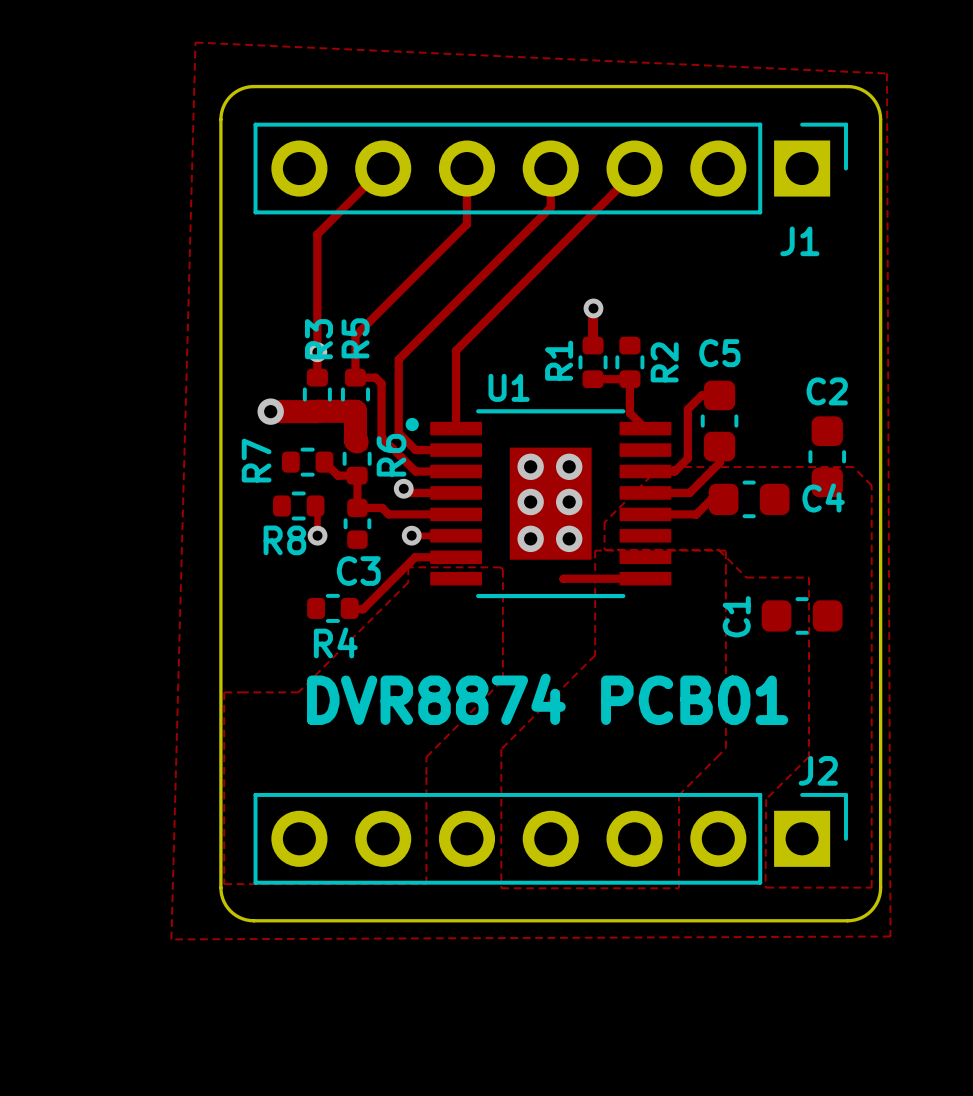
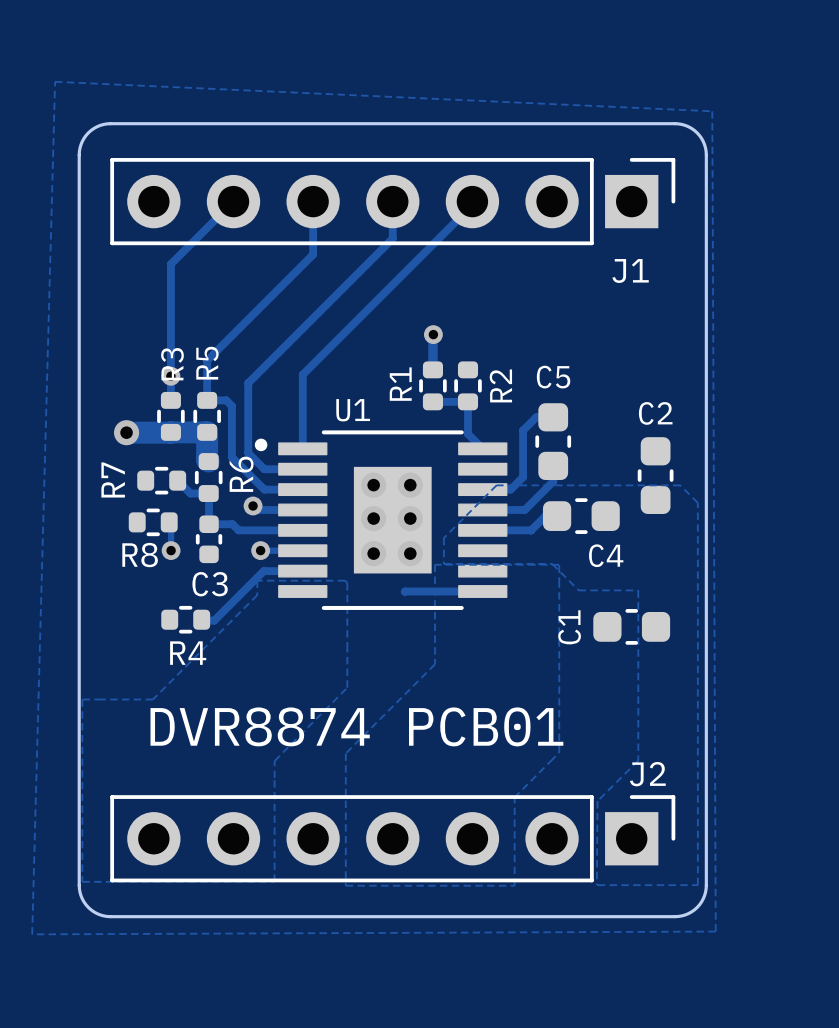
C4 name position: C4 (823, 497) -> C4 (606, 555)
text position: DVR8874 PCB01 (547, 699) -> DVR8874 PCB01 (356, 726)

